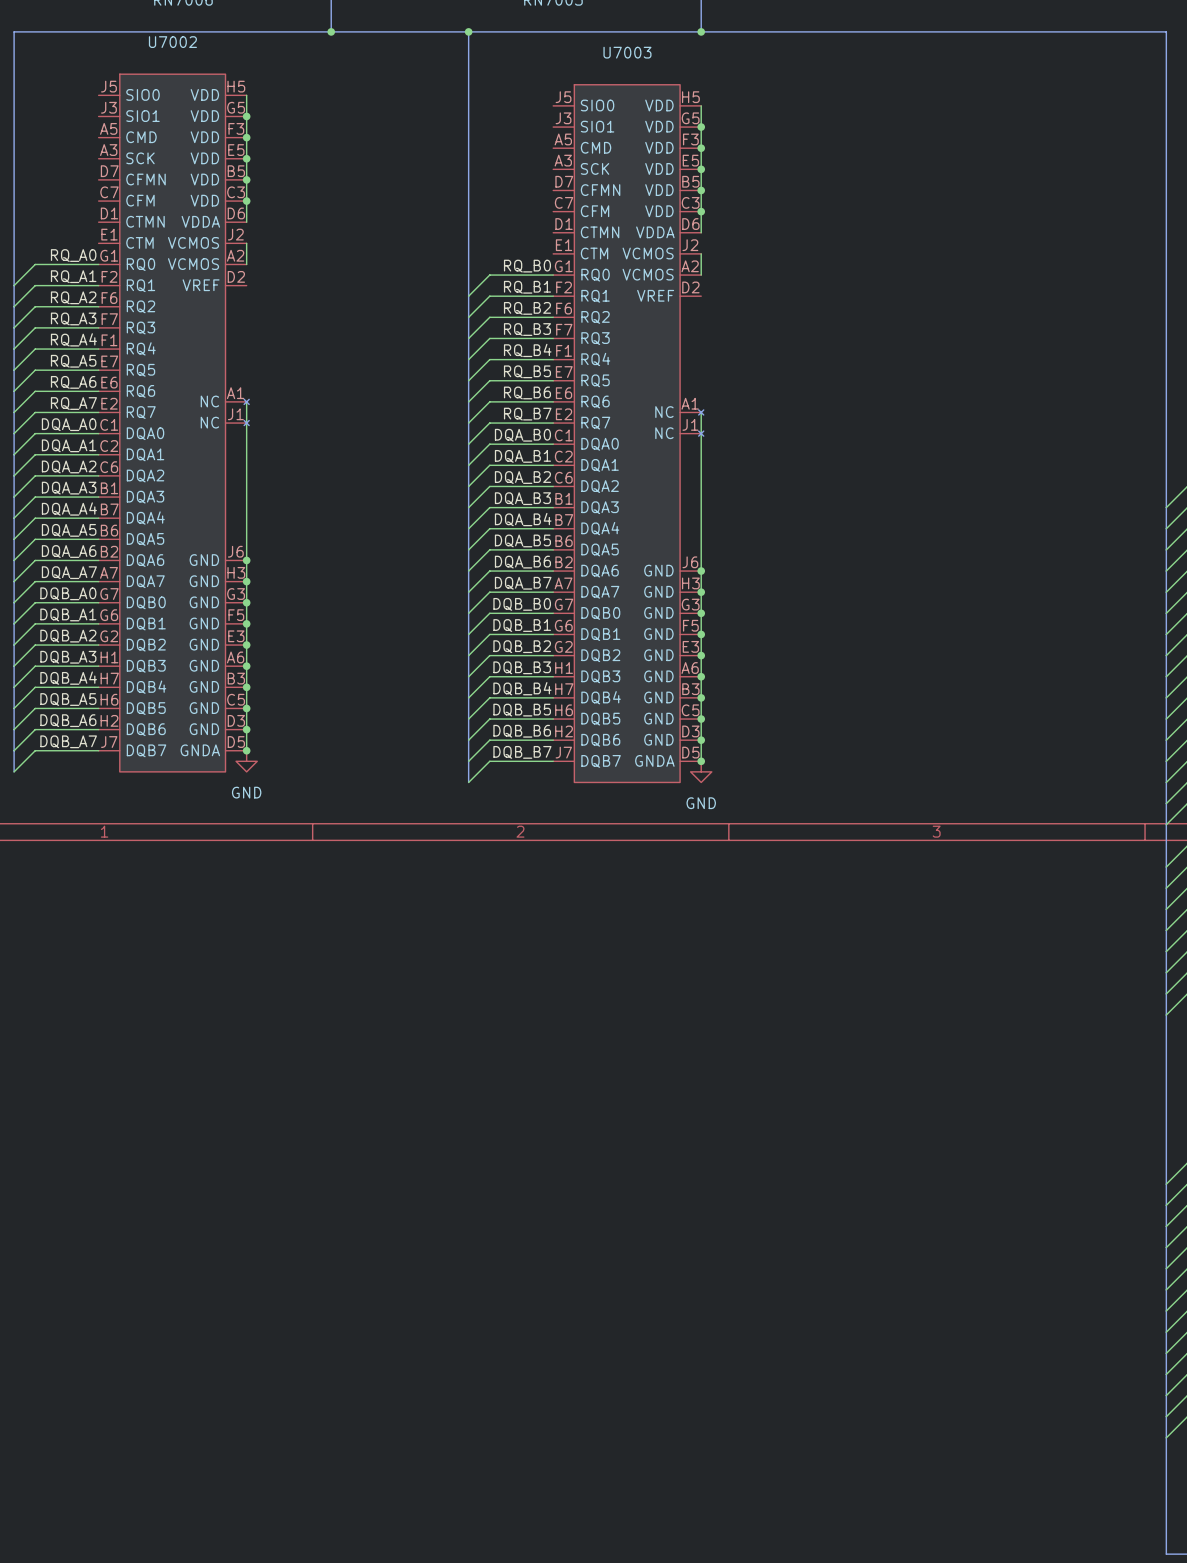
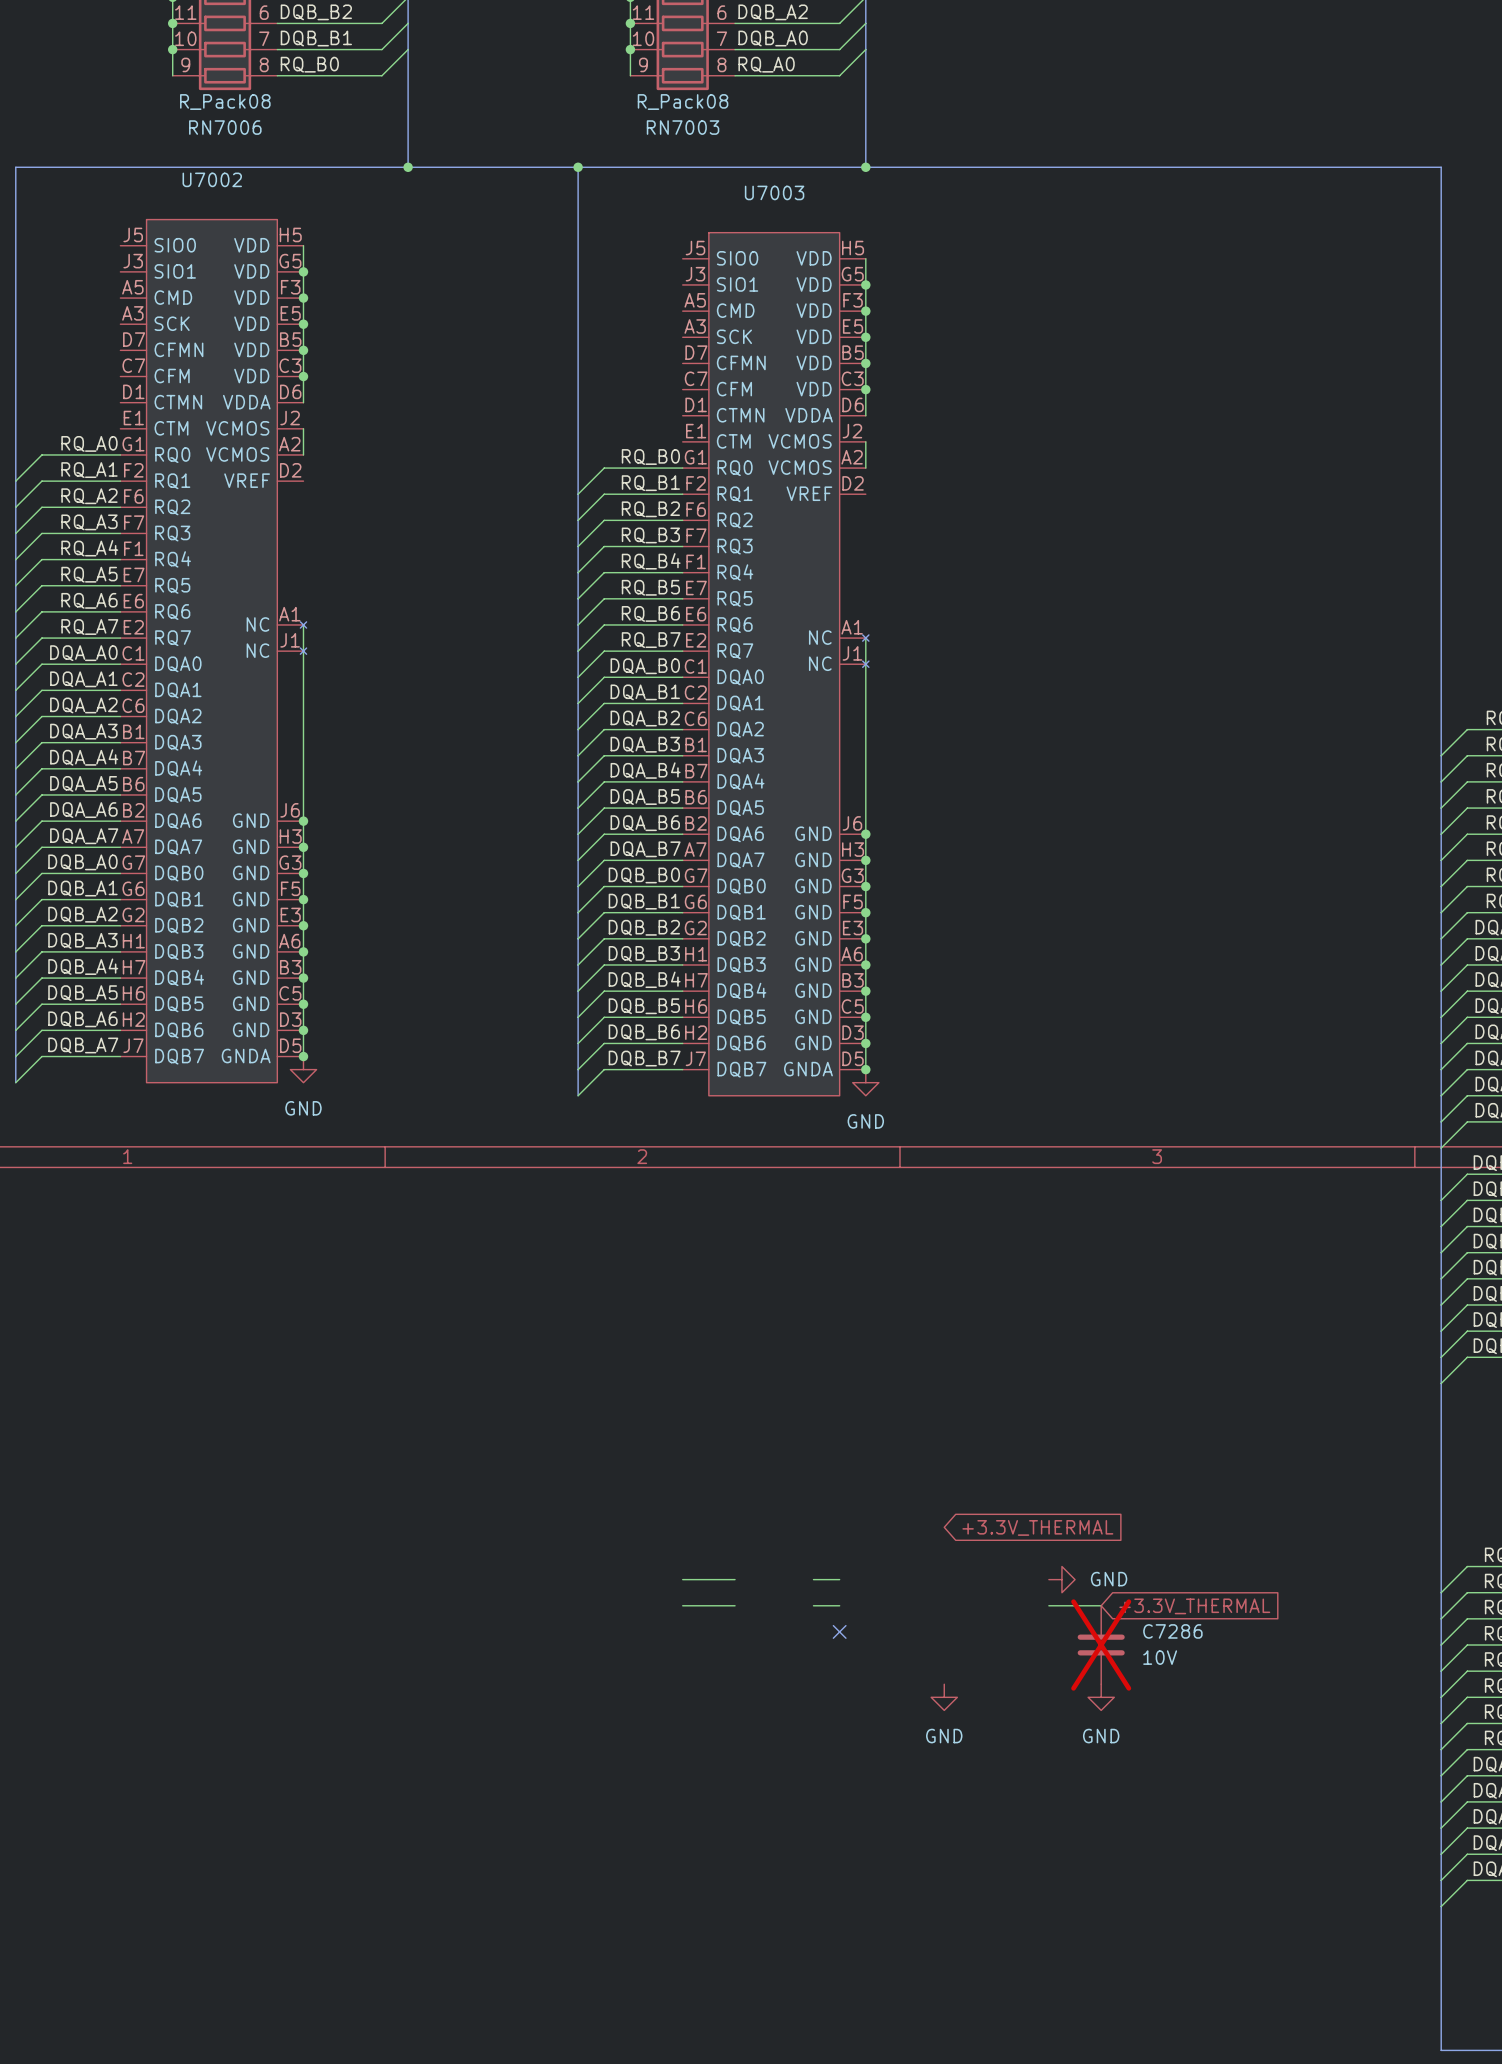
global label: none -> +3.3V_THERMAL (1037, 1527)
wire: none -> (682, 1579) (735, 1579)
wire: none -> (813, 1579) (839, 1579)
power symbol: none -> GND (1061, 1579)
wire: none -> (682, 1605) (735, 1605)
wire: none -> (813, 1605) (839, 1605)
wire: none -> (1048, 1605) (1101, 1605)
global label: none -> +3.3V_THERMAL (1194, 1606)
no-connect mark: none -> (839, 1631)
C7286: none -> 10V (1101, 1645)
power symbol: none -> GND (944, 1697)
power symbol: none -> GND (1101, 1697)

